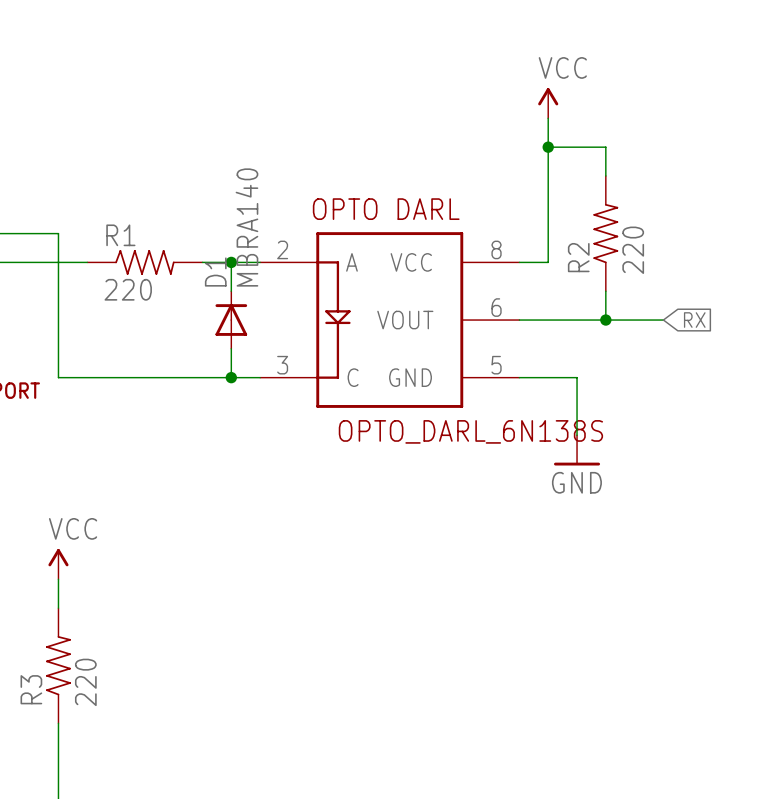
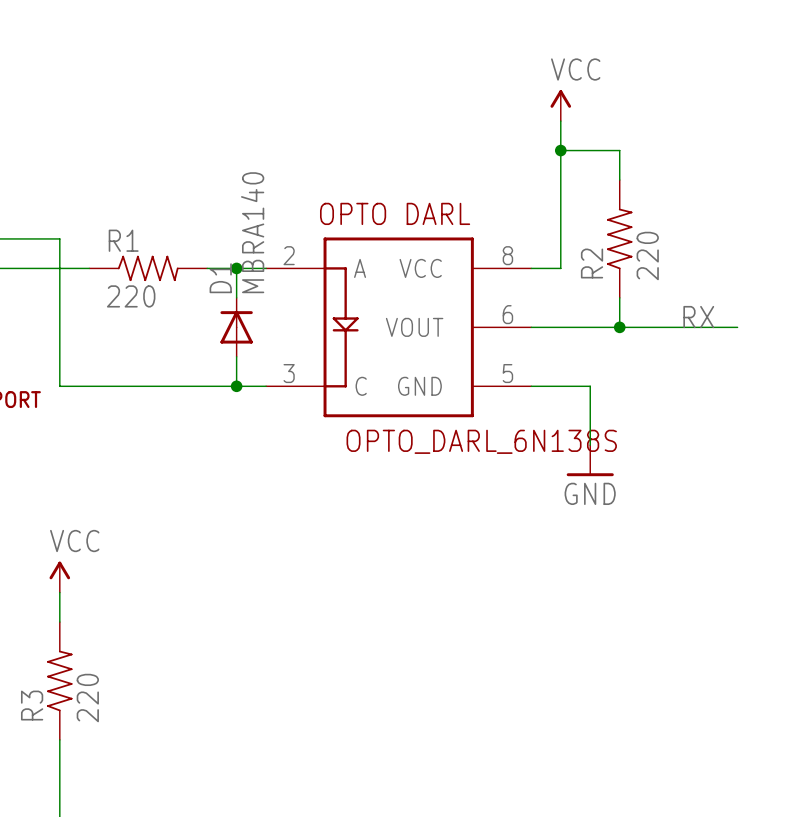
label: none -> RX (698, 317)
wire: none -> (678, 327) (737, 327)
global label: RX (694, 320) -> none

